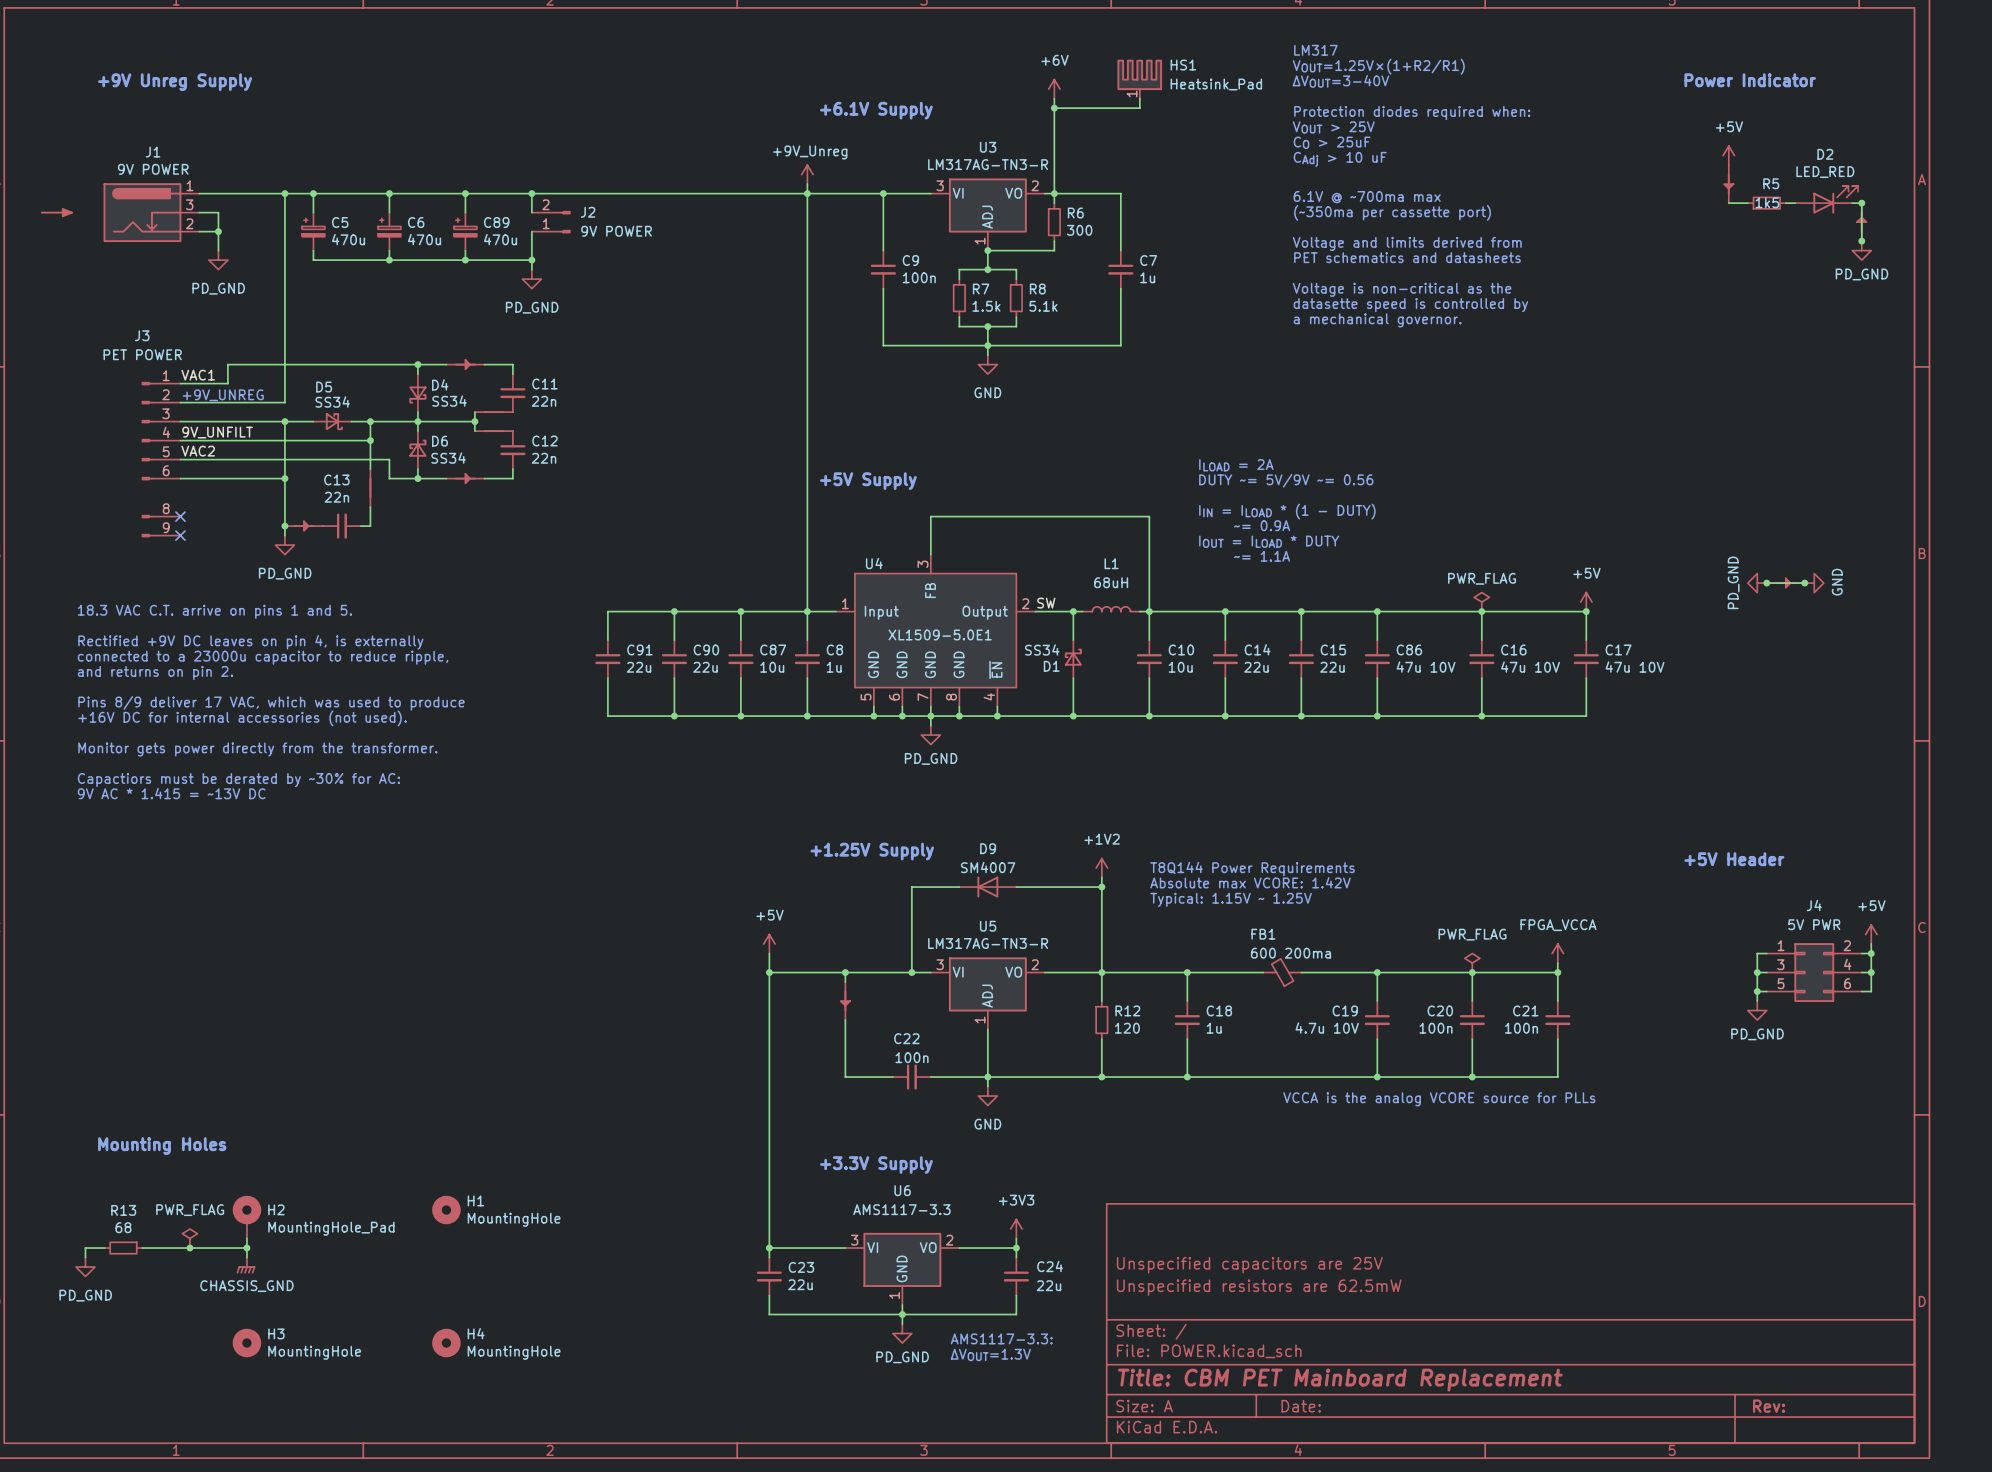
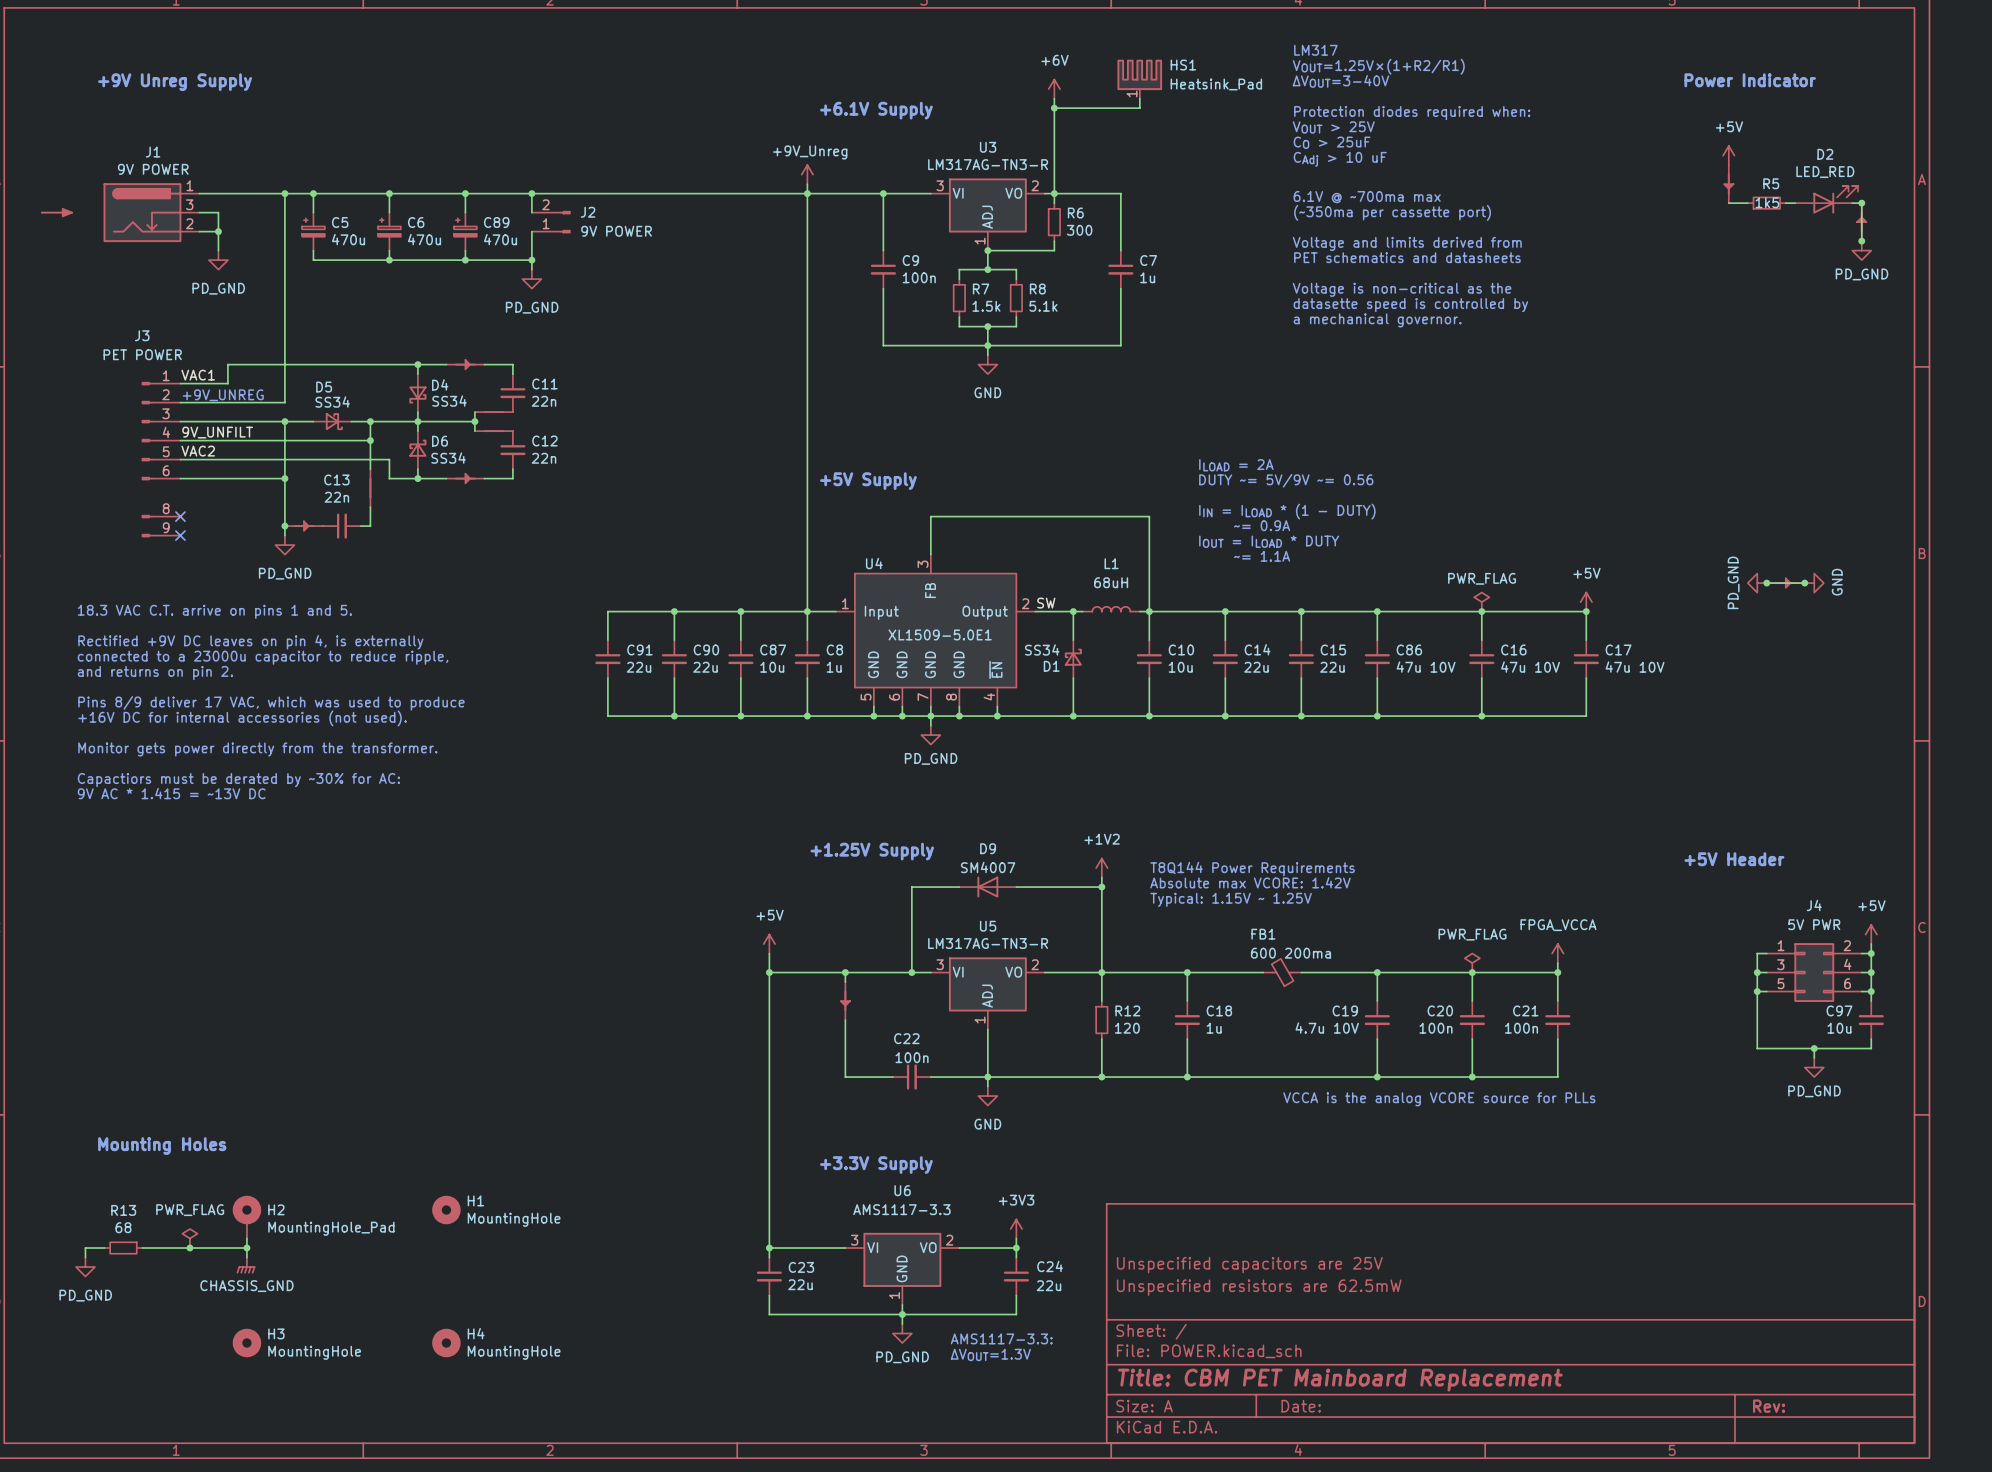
wire: none -> (1871, 991) (1871, 1001)
junction: none -> (1871, 991)
wire: none -> (1757, 1001) (1757, 1048) (1871, 1048) (1871, 1039)
power symbol position: PD_GND (1757, 1010) -> PD_GND (1814, 1067)
C97: none -> 10u (1871, 1020)
wire: none -> (1814, 1048) (1814, 1058)
junction: none -> (1814, 1048)

